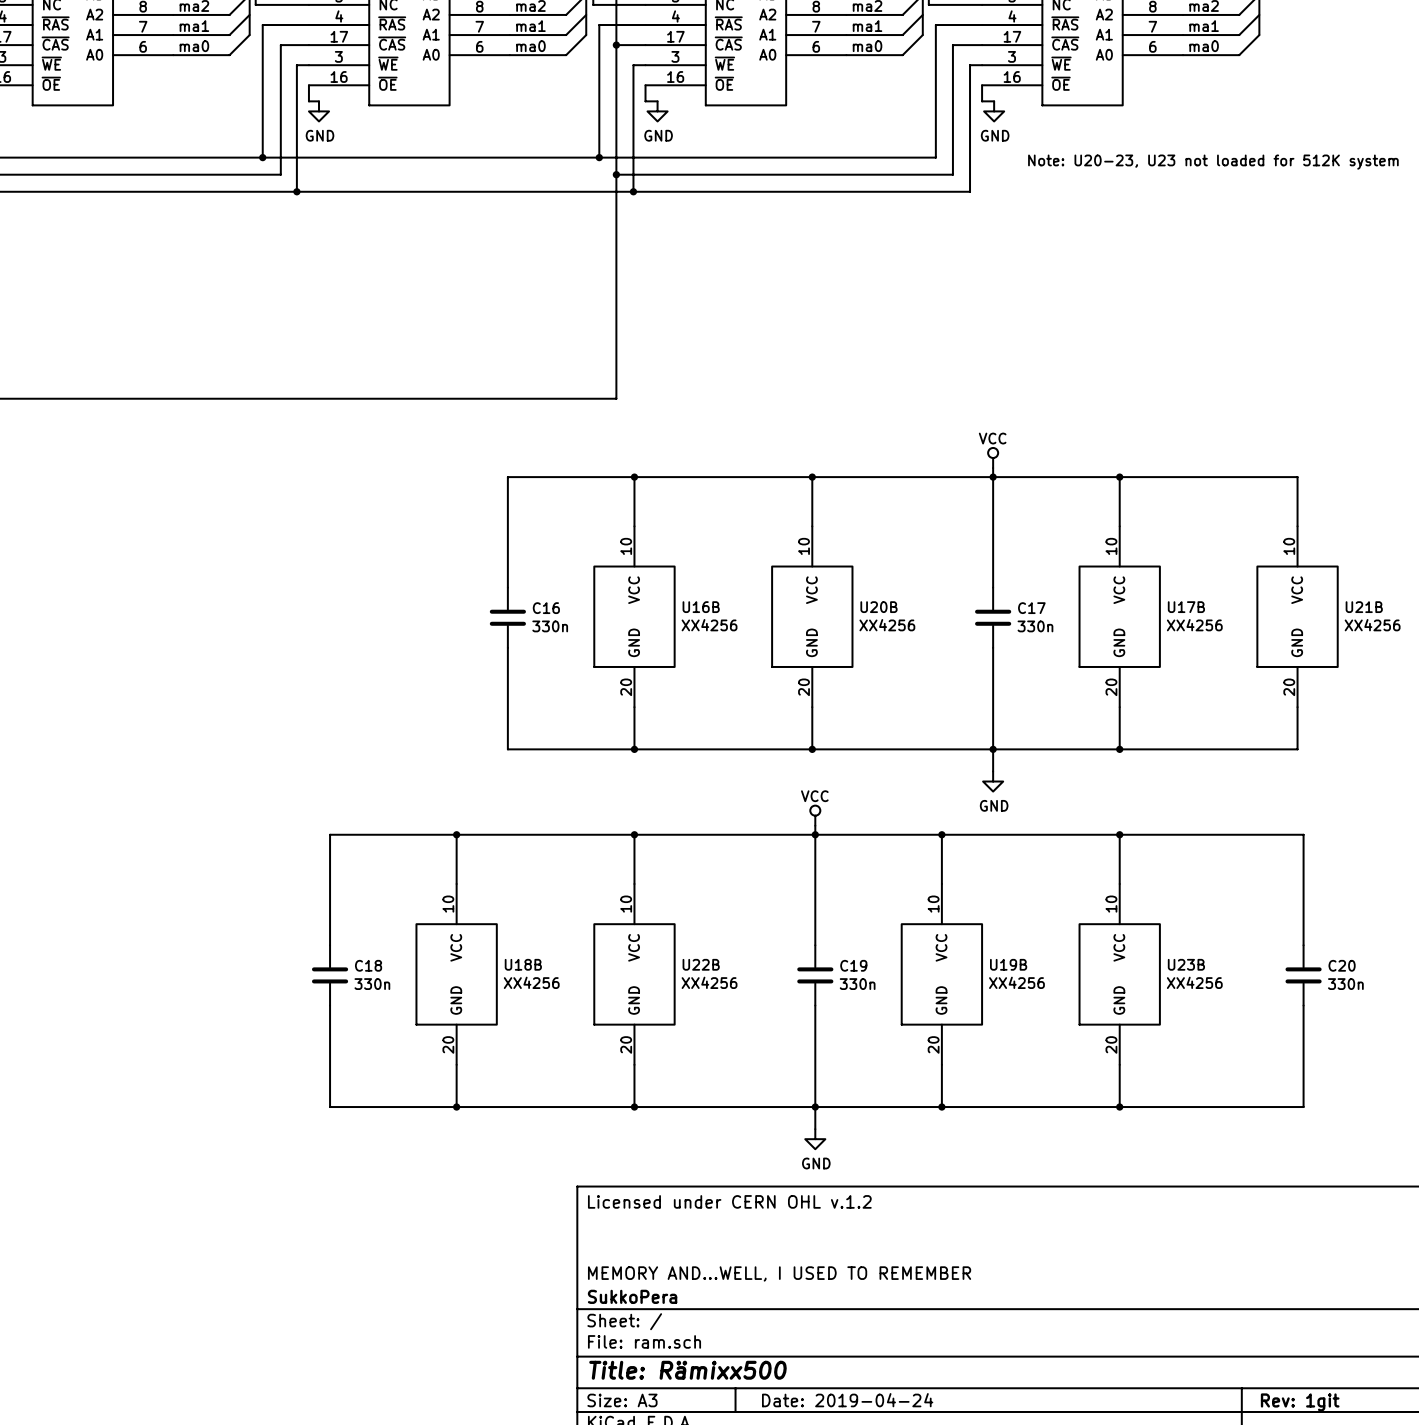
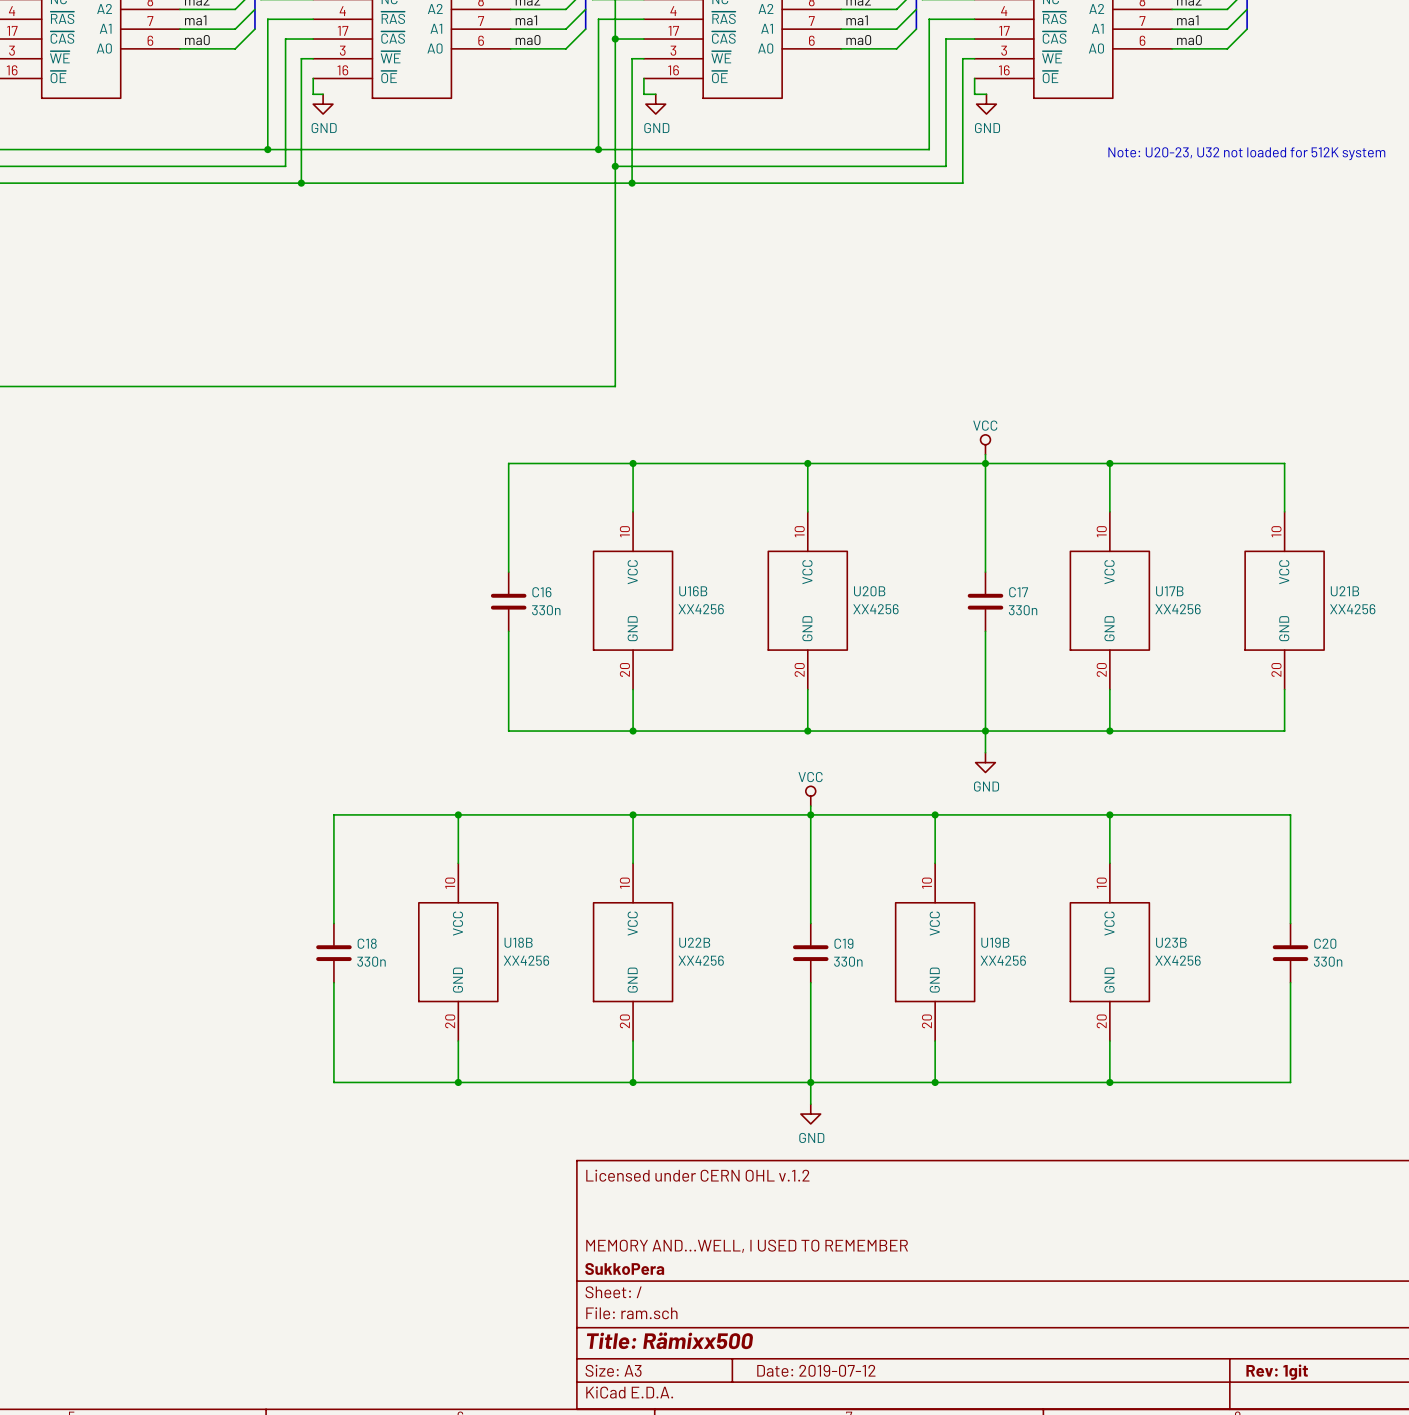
text: Note: U20-23, U23 not loaded for 512K system (1213, 162) -> Note: U20-23, U32 not loaded for 512K system (1246, 153)
title block: Date: 2019-04-24 (847, 1400) -> Date: 2019-07-12 (816, 1370)

